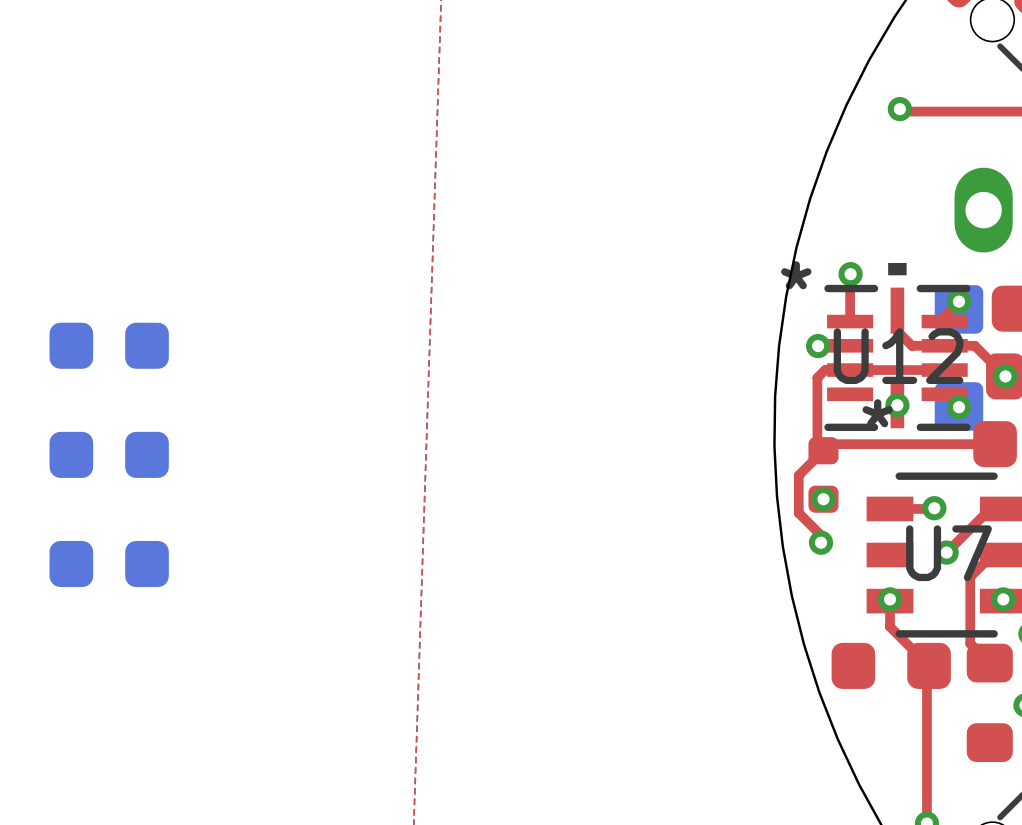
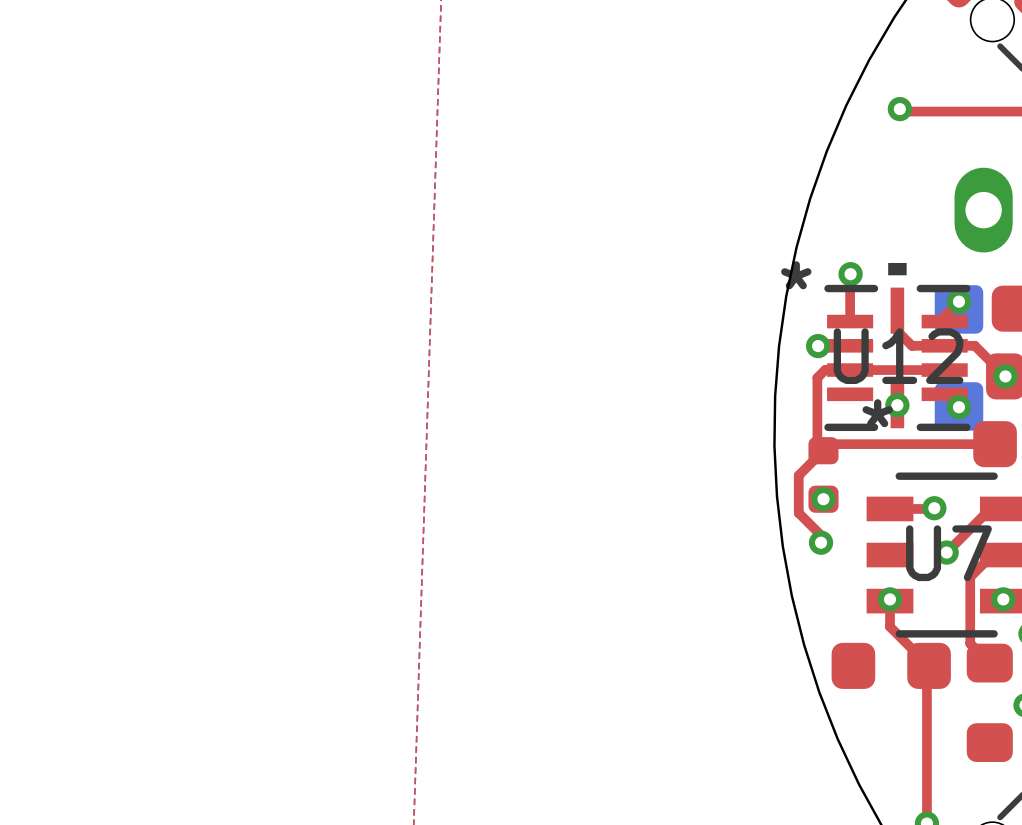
part: (109, 345) -> none
part: (109, 454) -> none
part: (109, 564) -> none

